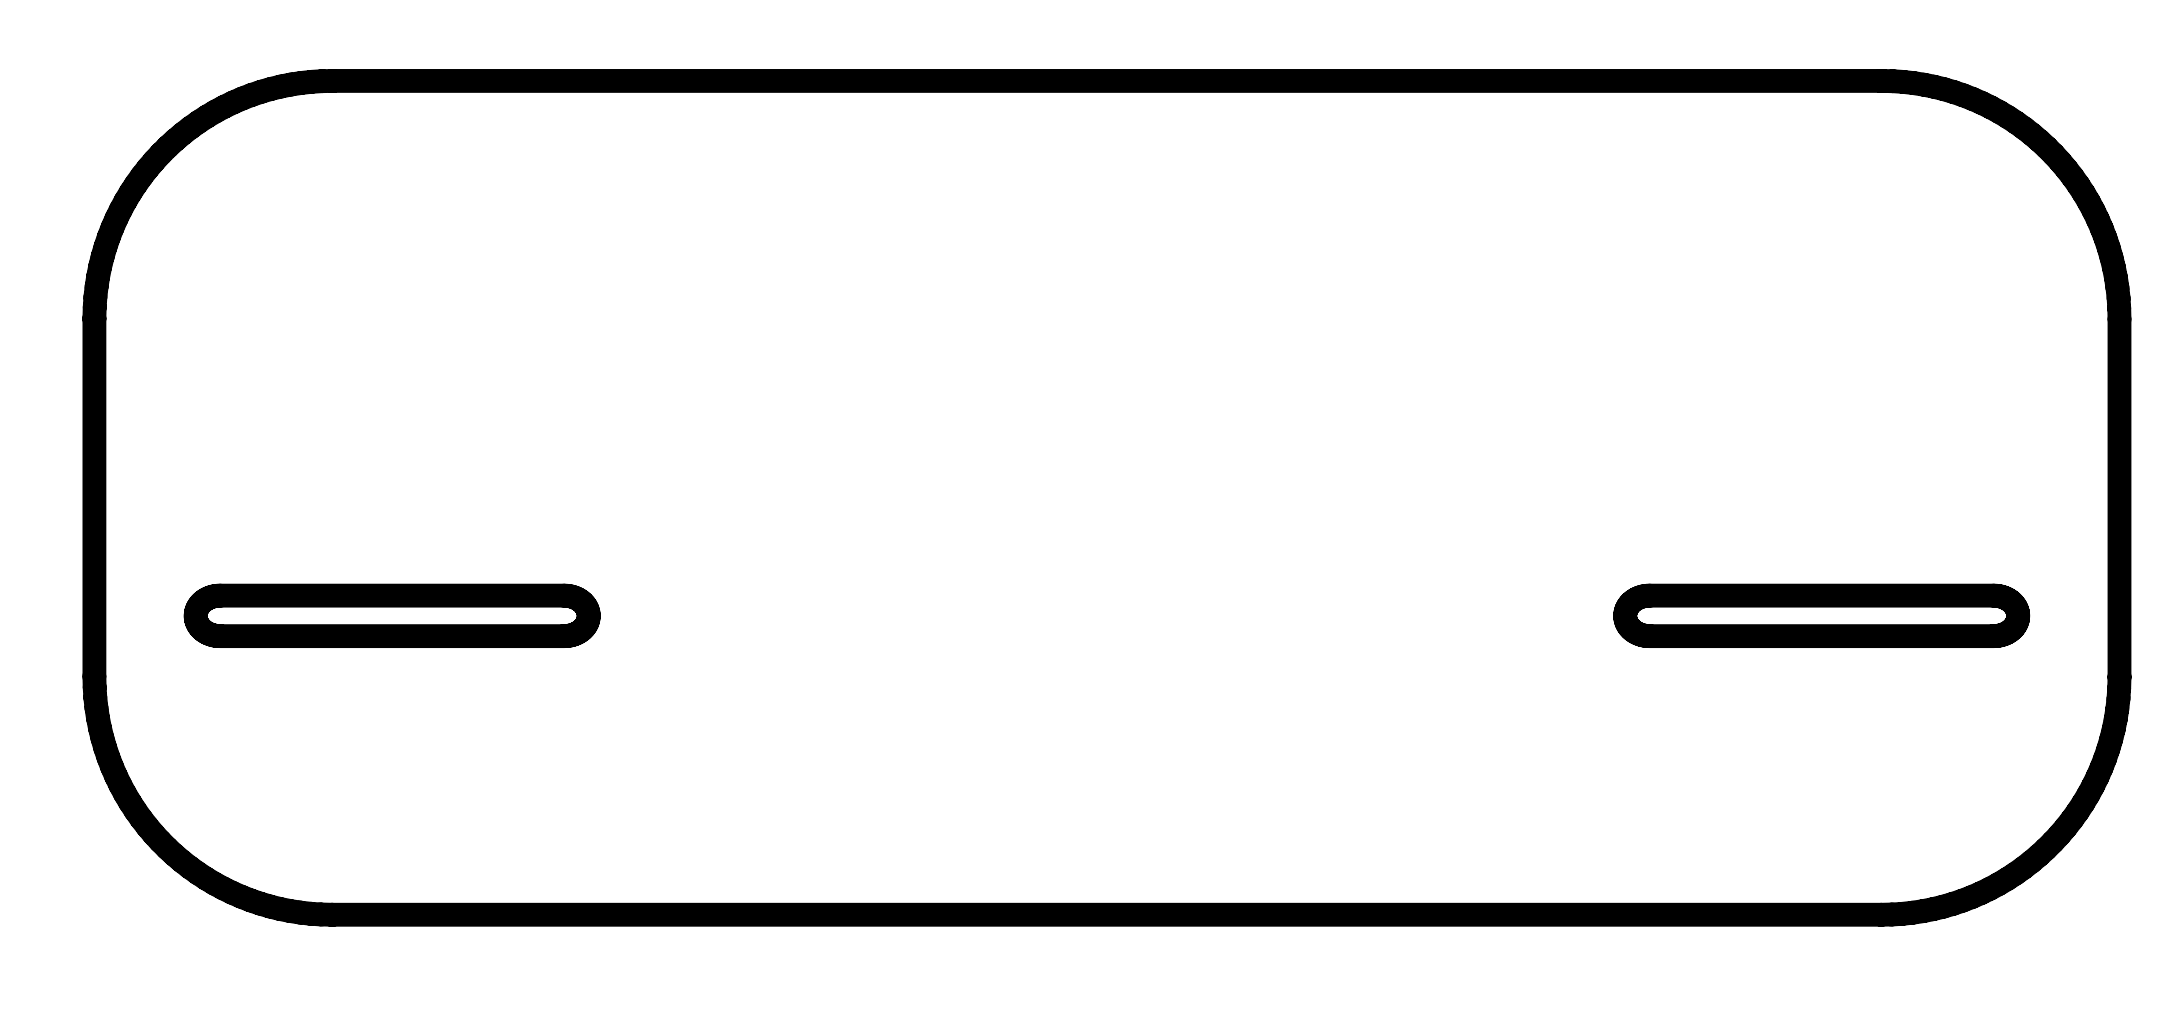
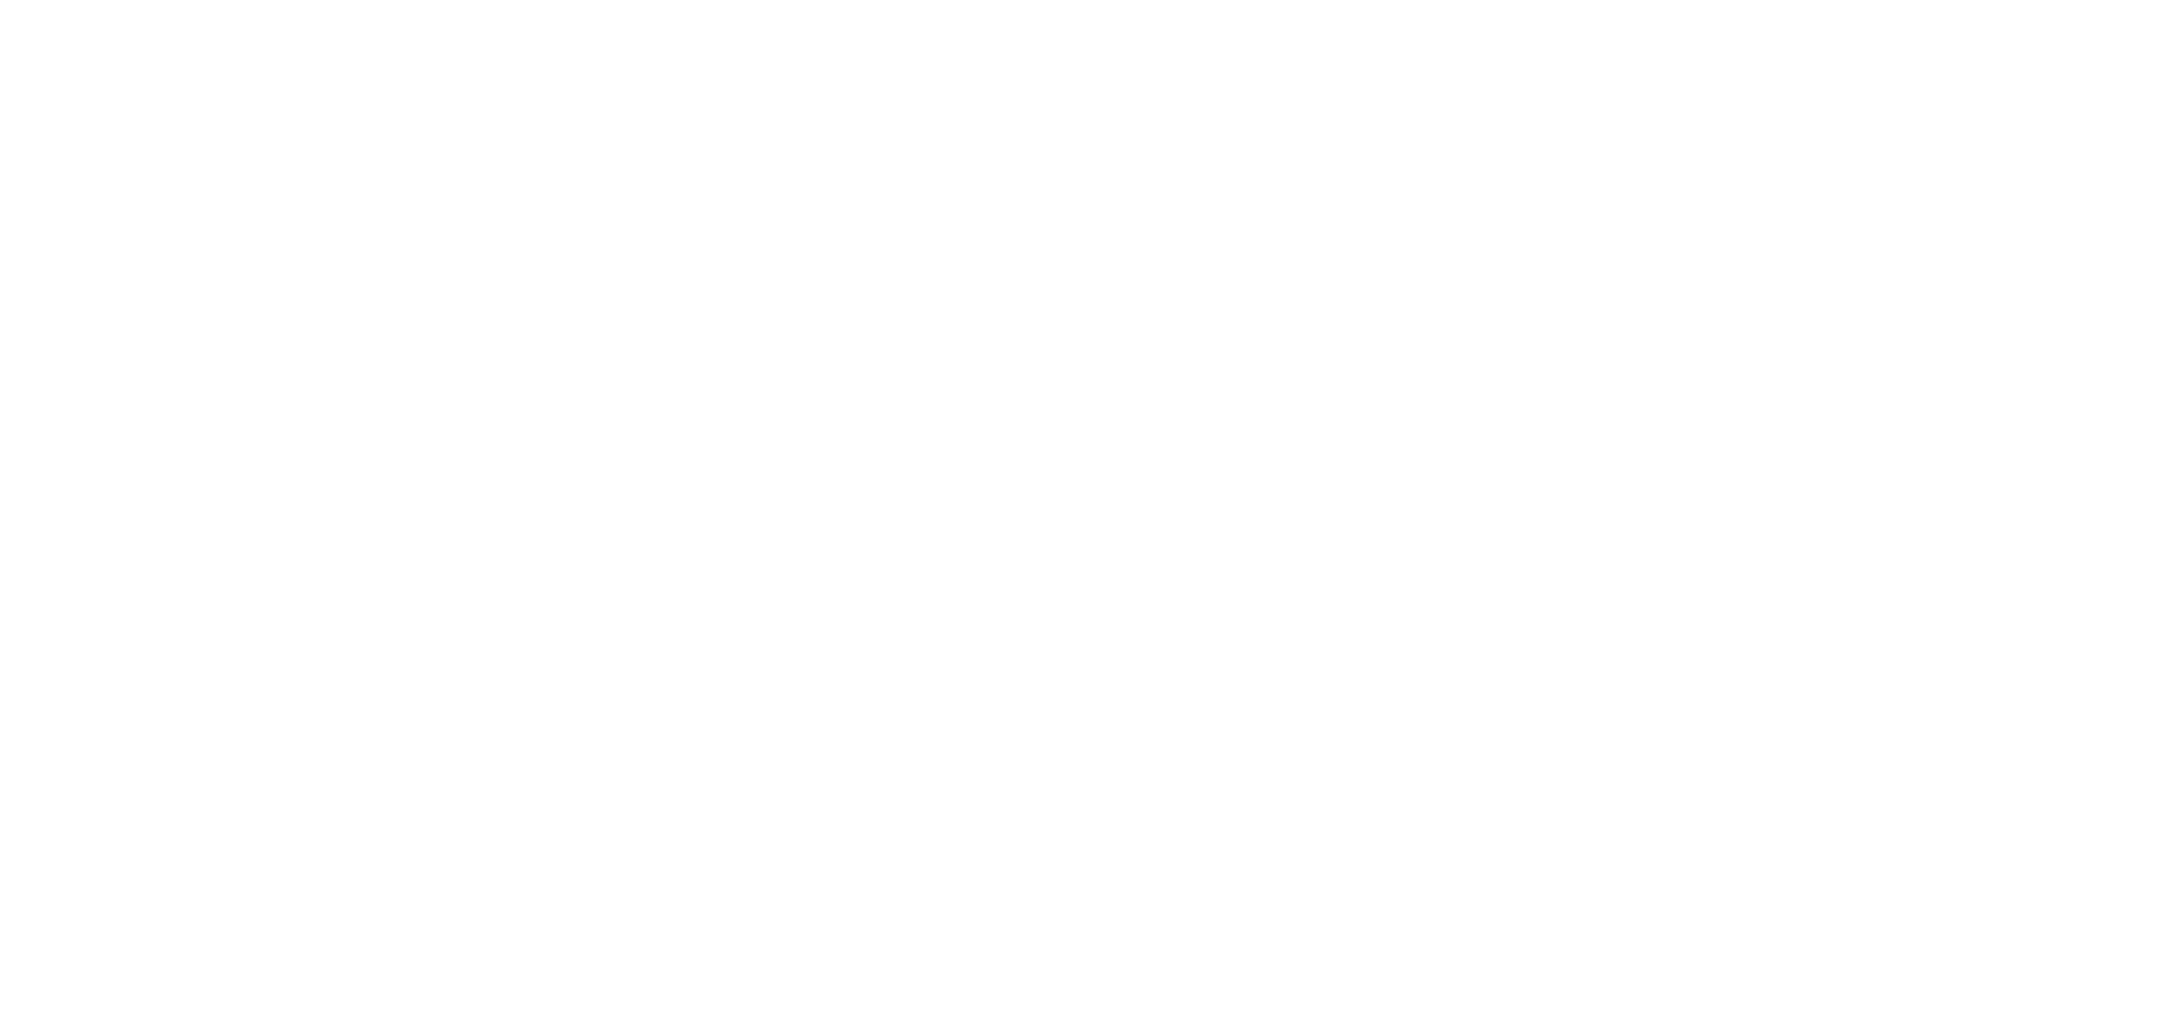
board edge: (332, 80) (290, 84) (251, 94) (215, 111) (175, 140) (141, 176) (120, 209) (102, 256) (95, 296) (94, 676) (96, 707) (102, 738) (120, 785) (135, 810) (153, 833) (174, 854) (197, 873) (223, 888) (250, 900) (289, 910) (331, 914) (1902, 913) (1933, 909) (1962, 900) (1998, 884) (2023, 867) (2045, 848) (2072, 819) (2088, 794) (2105, 758) (2115, 719) (2119, 677) (2119, 319) (2113, 267) (2105, 238) (2093, 210) (2078, 185) (2060, 161) (2039, 140) (2016, 122) (1990, 107) (1963, 95) (1924, 84) (1882, 80) (332, 80) -> none
board edge: (217, 595) (208, 598) (200, 603) (196, 610) (195, 618) (198, 625) (205, 631) (220, 636) (567, 636) (576, 633) (583, 628) (588, 615) (586, 608) (581, 601) (567, 595) (217, 595) -> none
board edge: (1646, 595) (1637, 598) (1630, 603) (1626, 610) (1625, 618) (1628, 625) (1634, 631) (1649, 636) (1996, 636) (2005, 633) (2013, 628) (2018, 615) (2016, 608) (2011, 601) (1997, 595) (1646, 595) -> none

